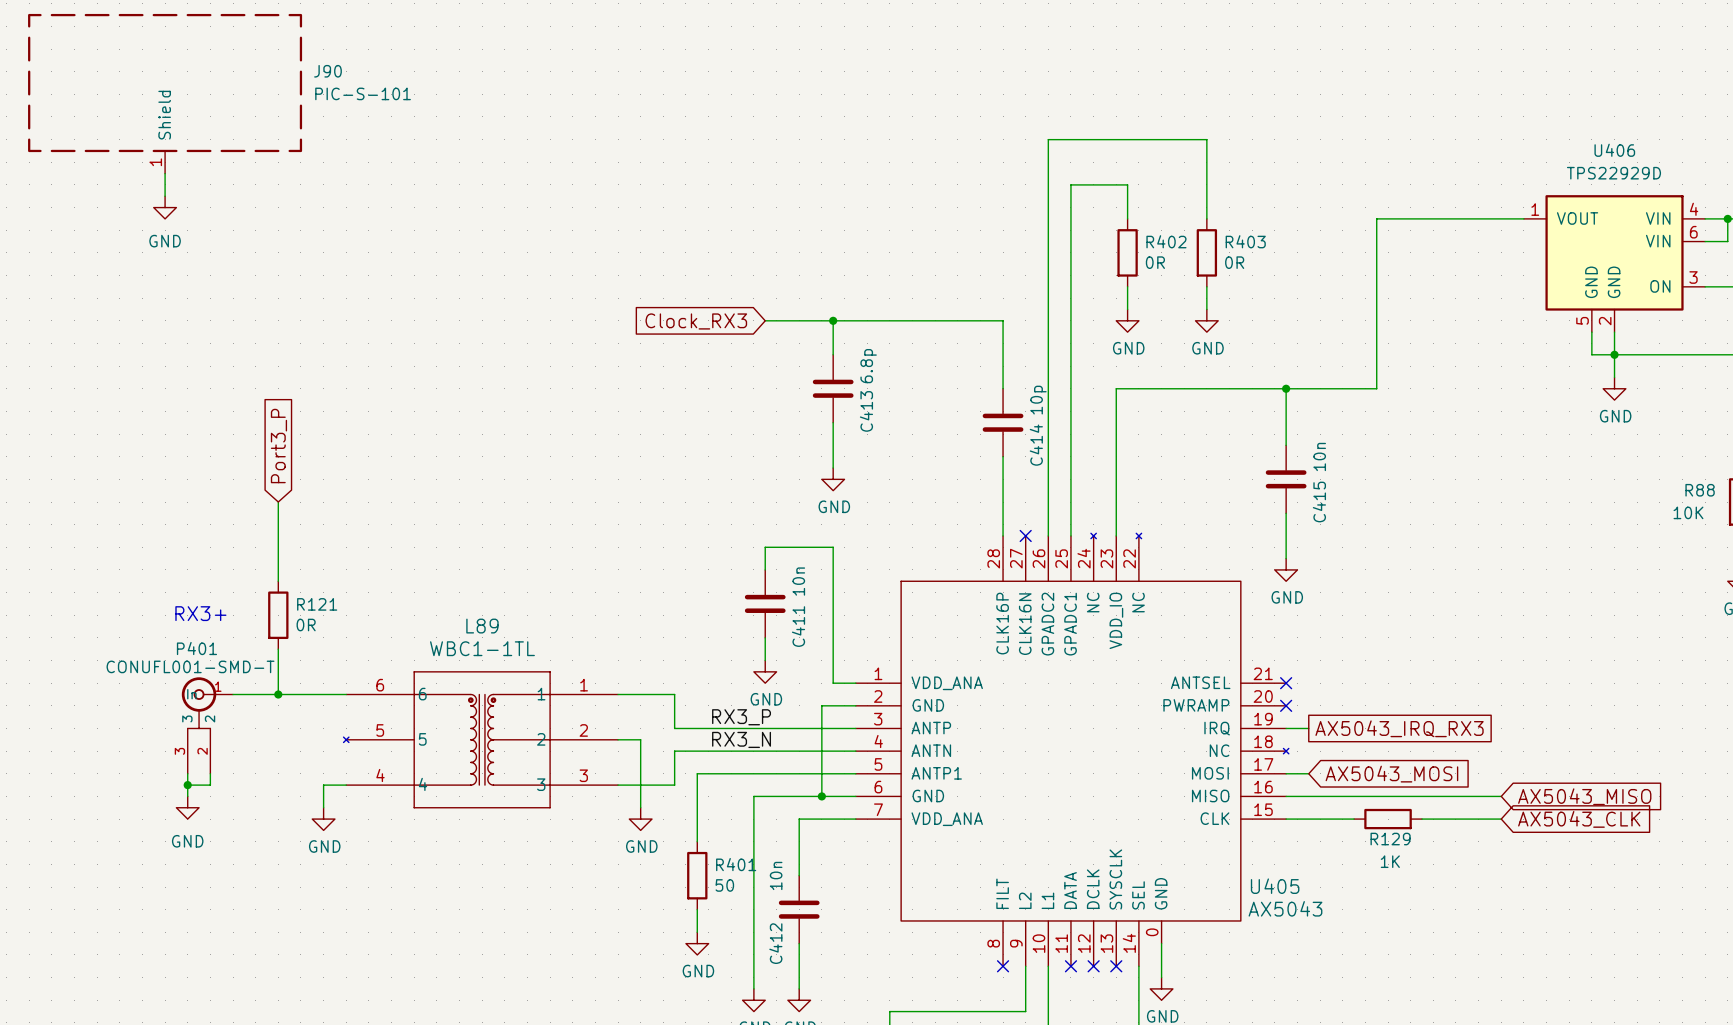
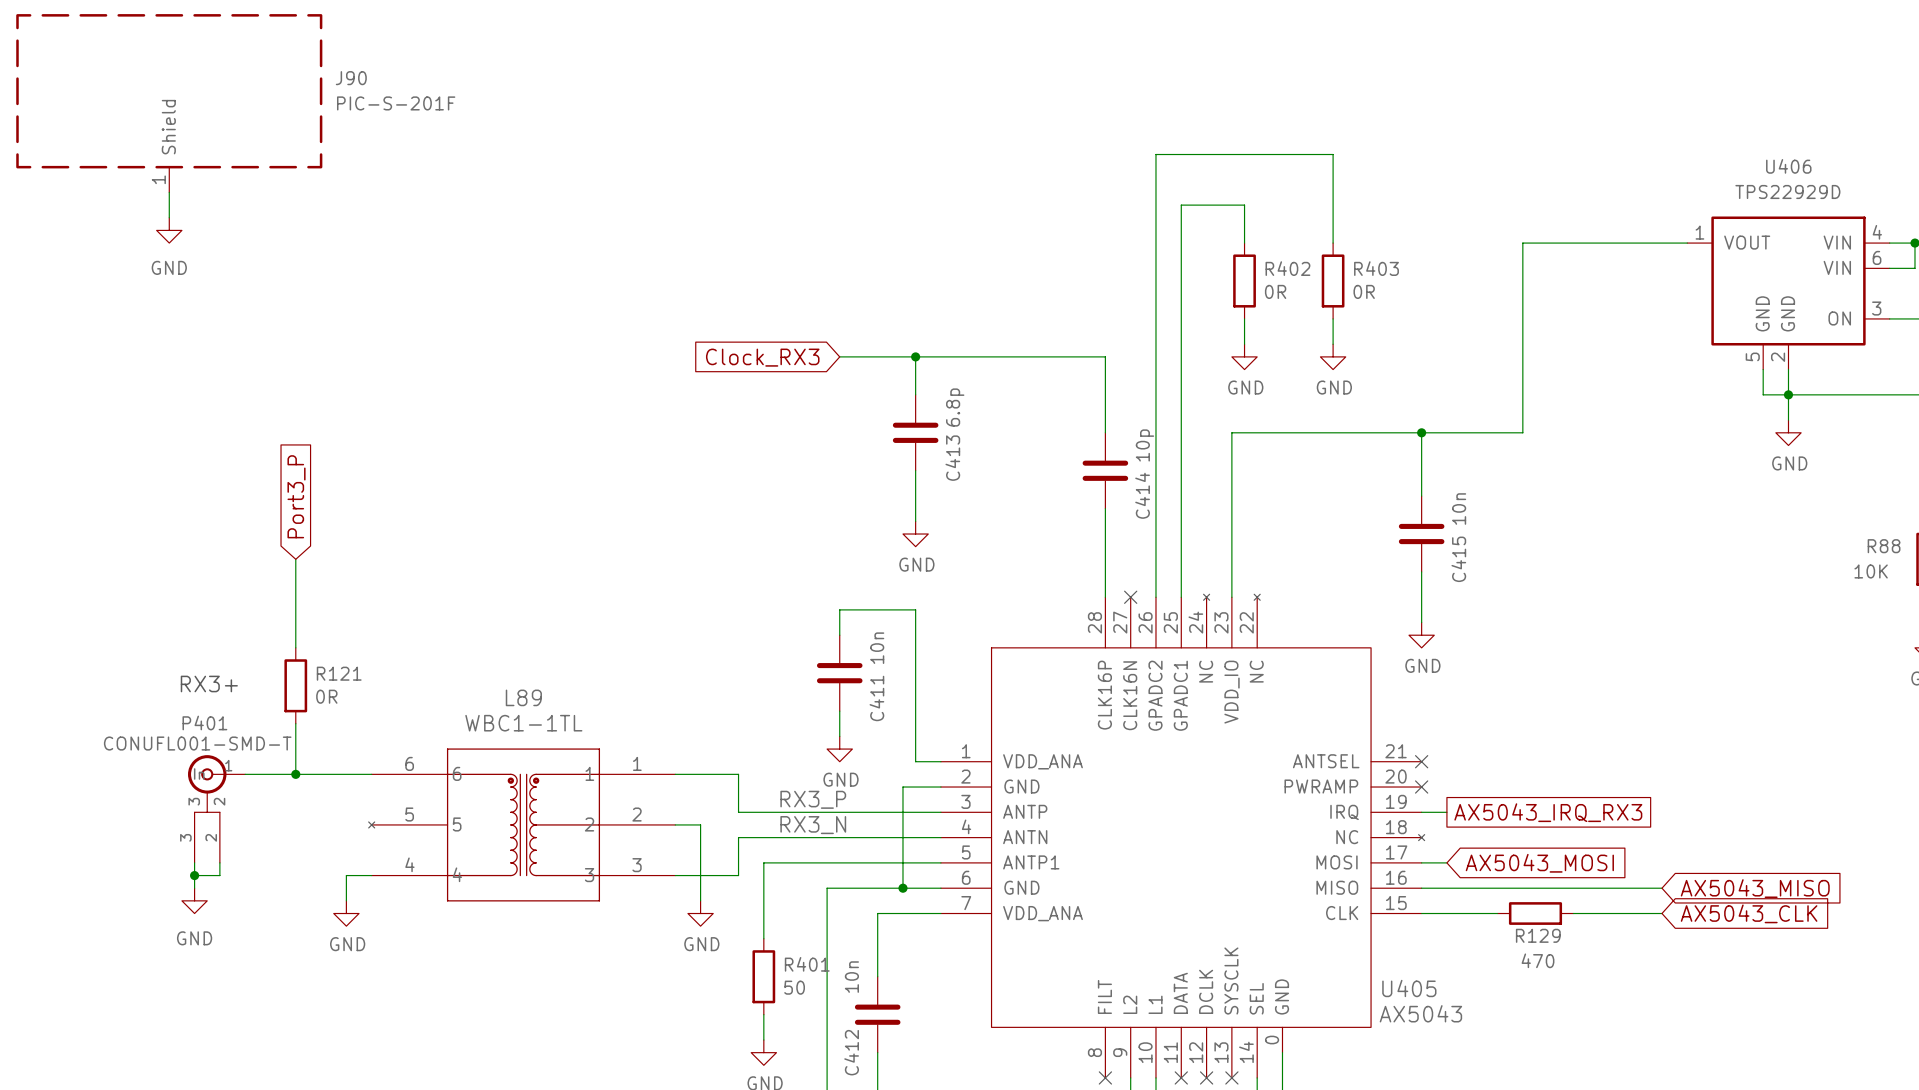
J90 value: PIC-S-101 (363, 93) -> PIC-S-201F (396, 103)
R129 value: 1K (1390, 861) -> 470 (1538, 960)

